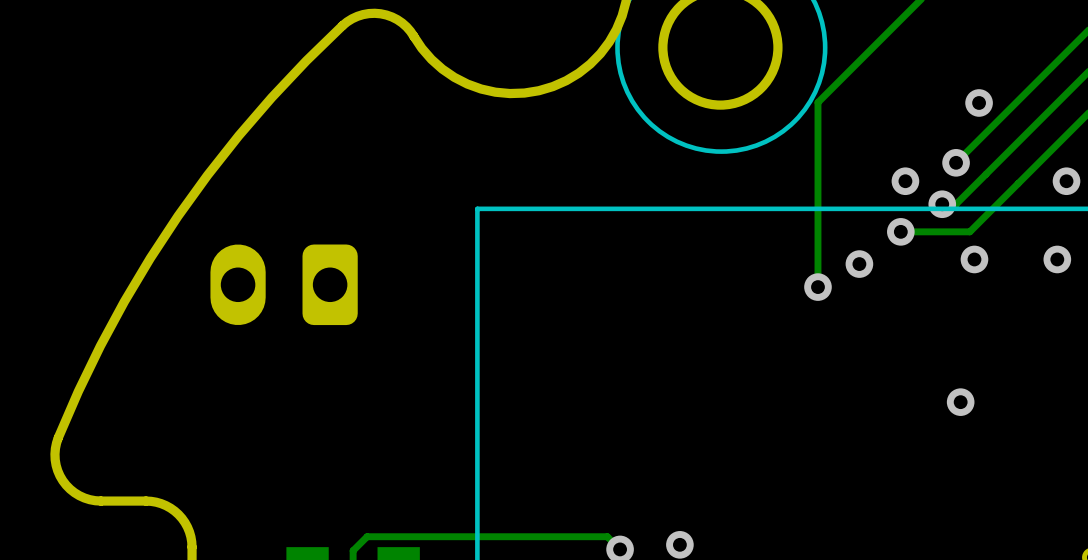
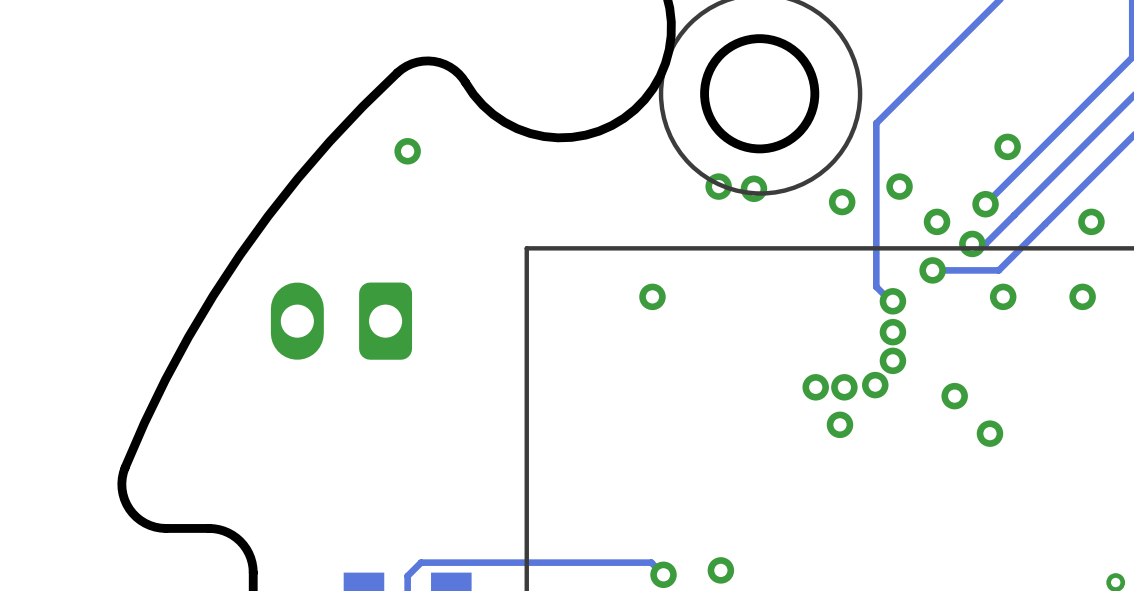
track: (842, 78) (817, 102) (817, 287) -> (876, 123) (876, 286) (892, 303)
via: none -> (407, 151)
via: none -> (718, 186)
via: none -> (899, 186)
via: none -> (753, 188)
via: none -> (842, 202)
via: none -> (652, 296)
via: (817, 287) -> none
via: none -> (892, 332)
via: none -> (892, 360)
via: none -> (875, 385)
via: none -> (815, 387)
via: none -> (844, 387)
via: none -> (954, 396)
via: none -> (839, 424)

